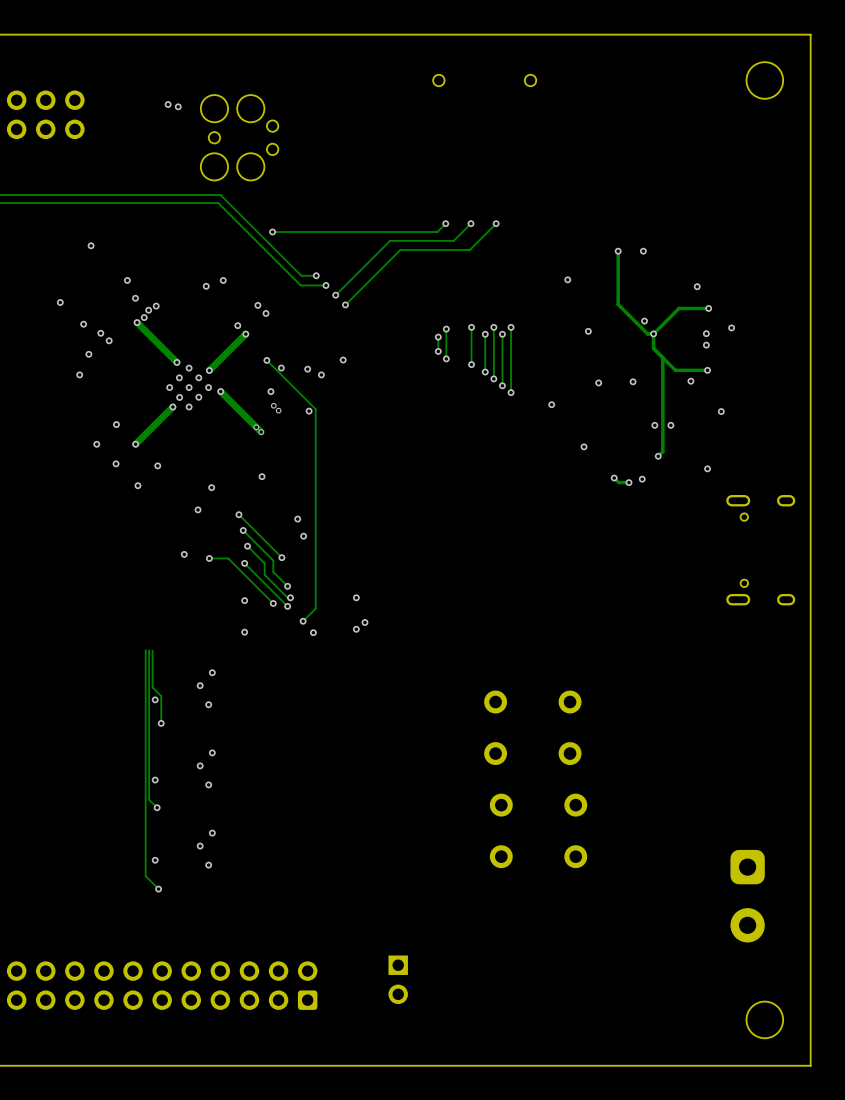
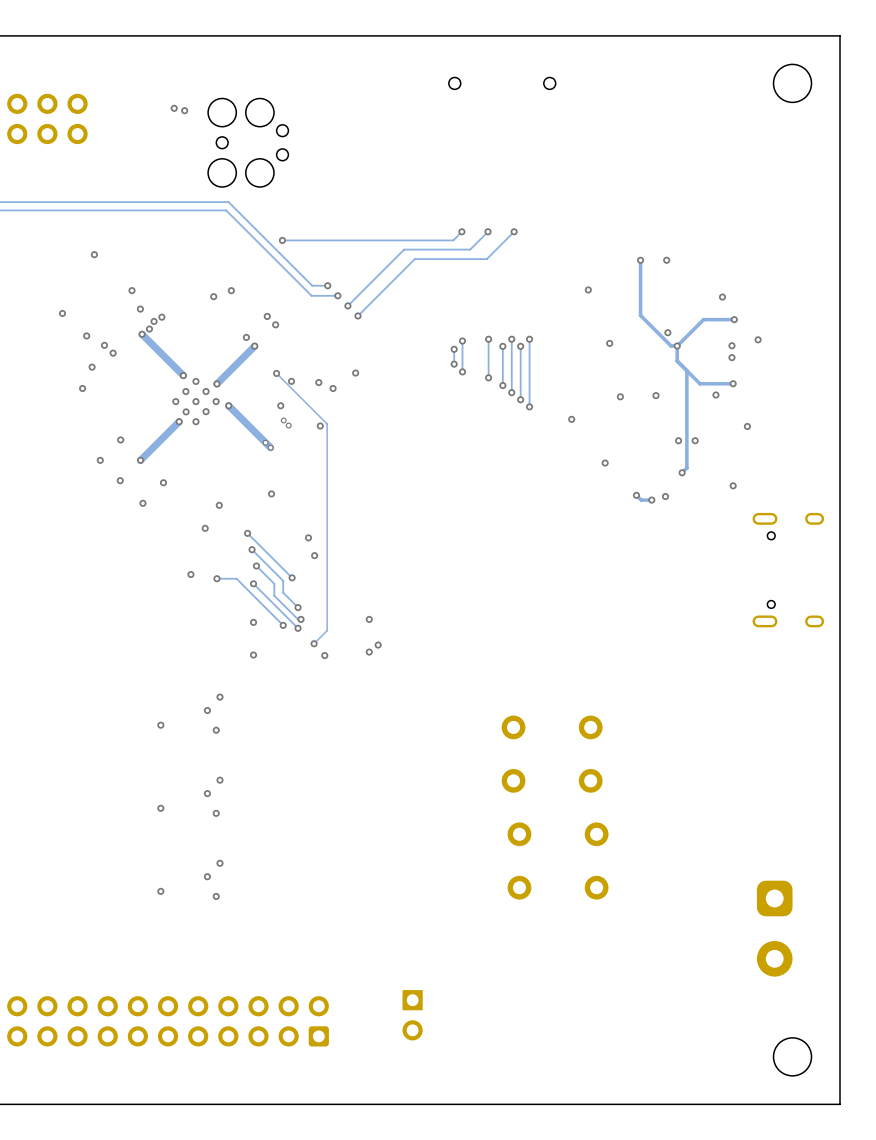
track: (145, 650) (145, 876) (158, 889) -> none
track: (149, 650) (149, 799) (157, 807) -> none
track: (152, 650) (152, 687) (161, 696) (161, 723) -> none
via: (161, 723) -> none
via: (157, 807) -> none
via: (158, 889) -> none

